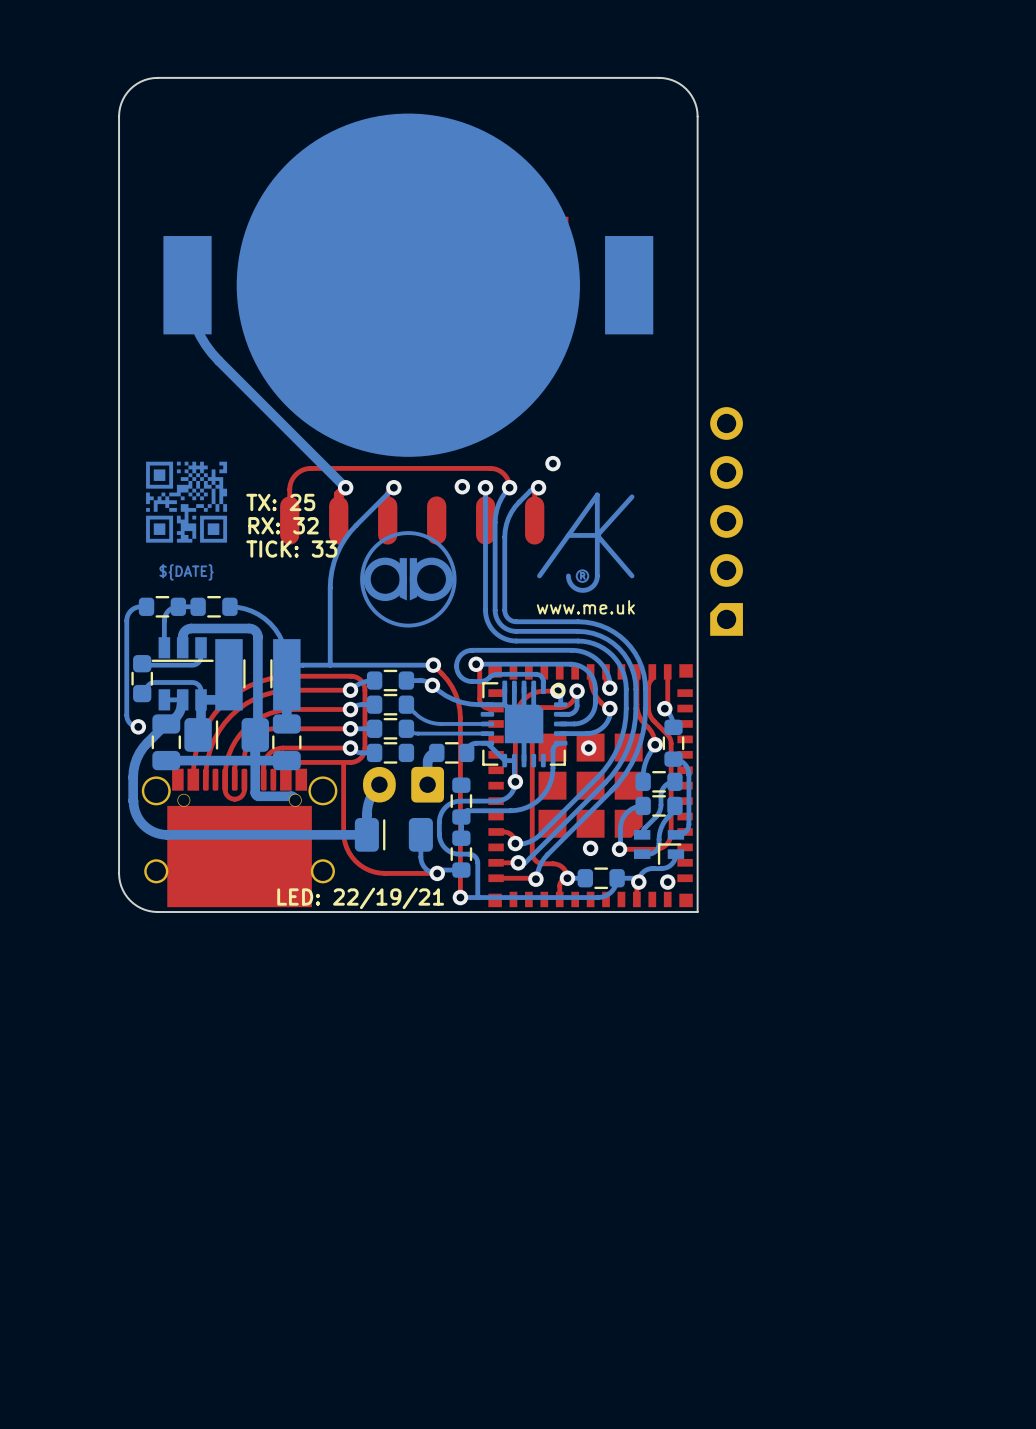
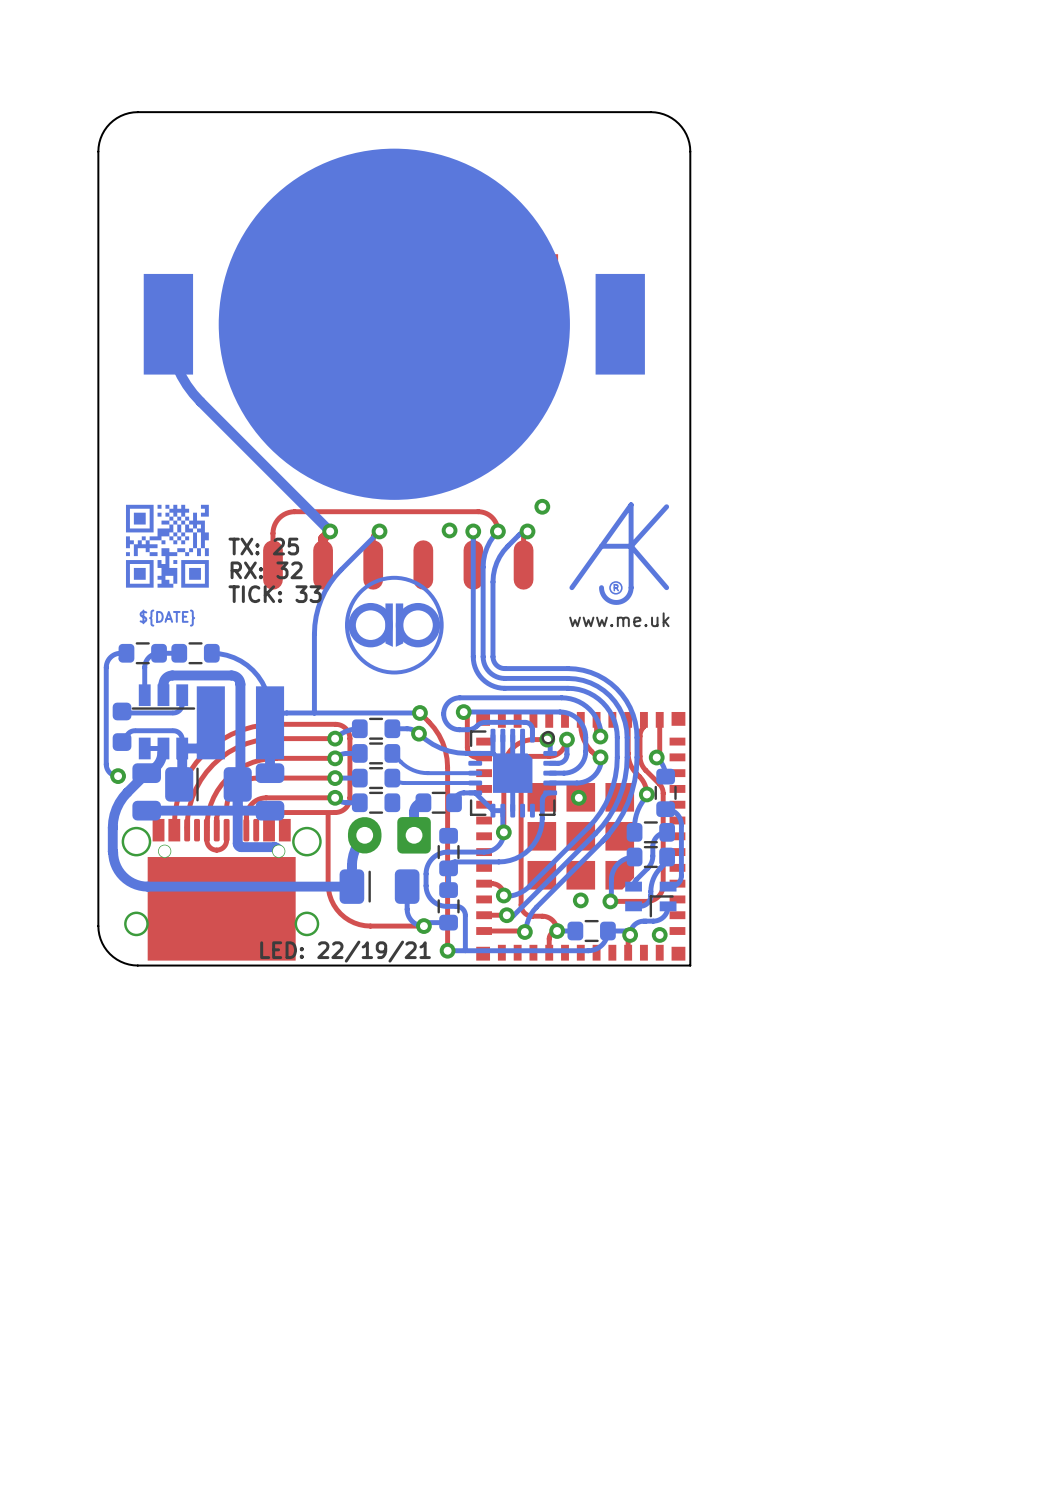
part: (726, 521) -> none
drawing position: (585, 542) -> (619, 553)
part footprint: [133, 623, 301, 771] -> [112, 670, 285, 821]
drawing: [243, 659, 273, 689] -> none
drawing: [131, 671, 153, 686] -> none
drawing: [215, 720, 219, 750] -> none
drawing: [151, 735, 181, 750] -> none
drawing: [272, 735, 302, 750] -> none

